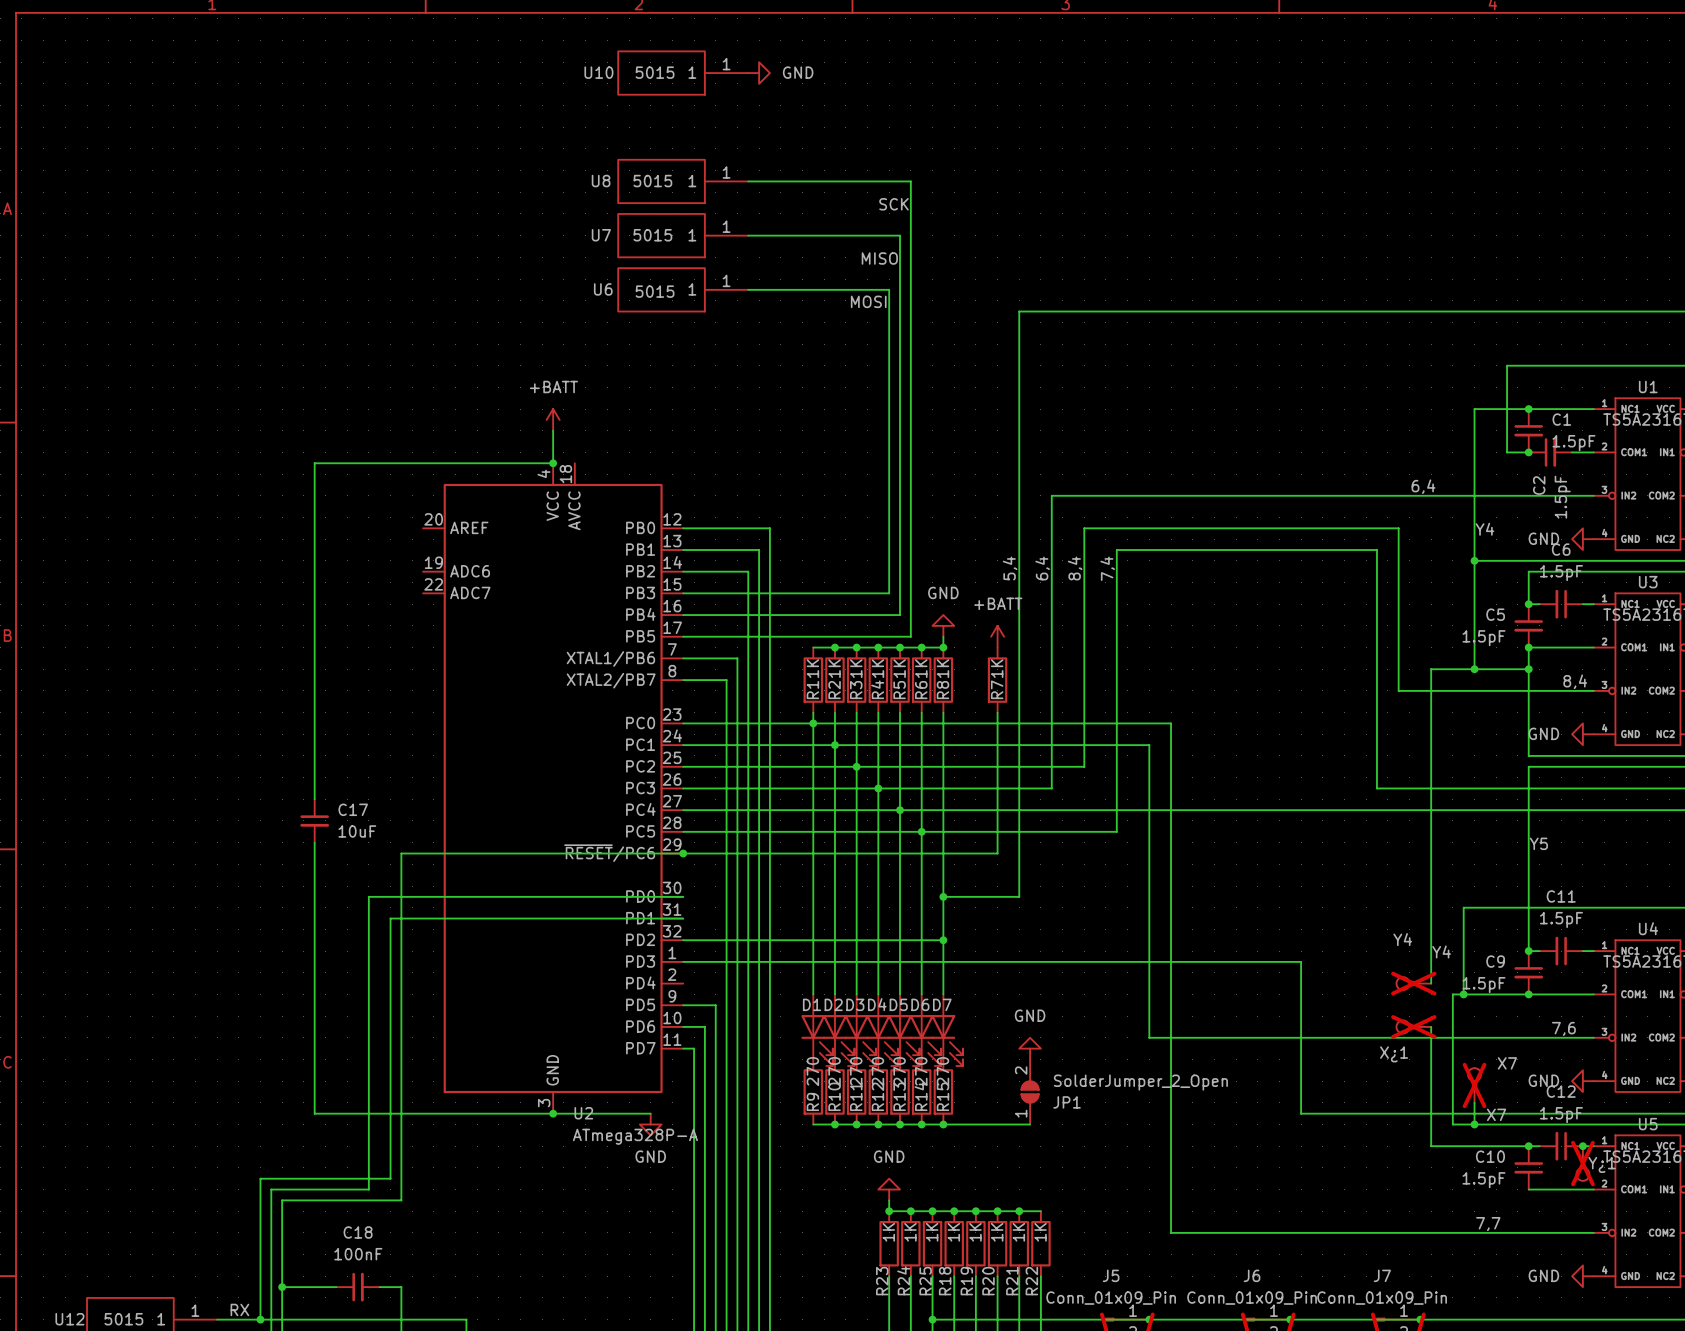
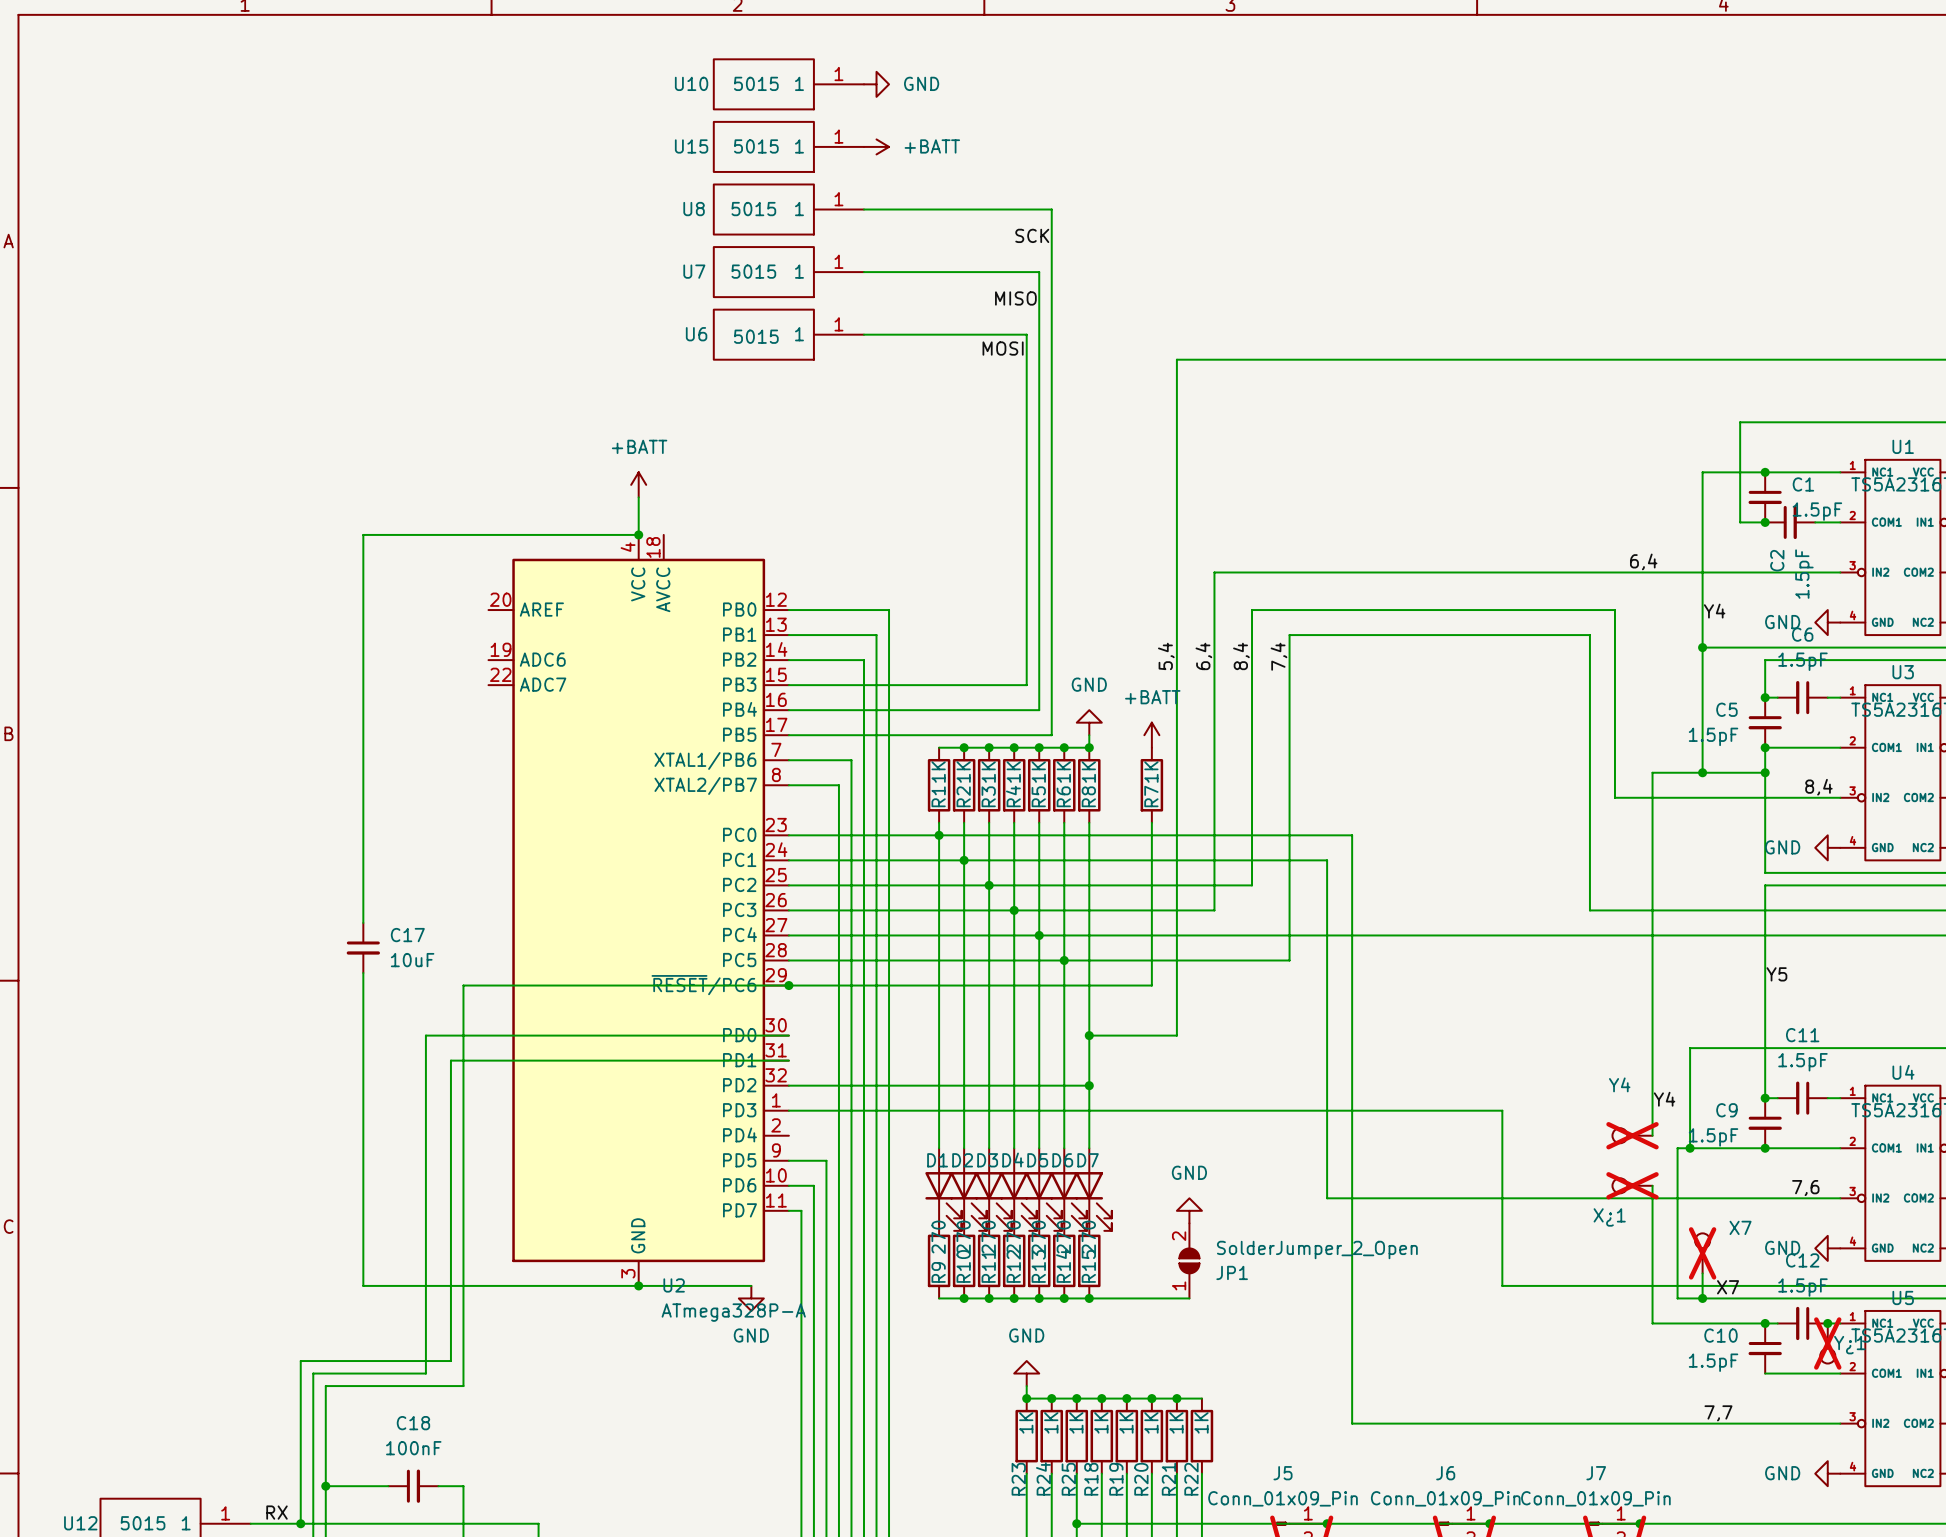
U15: none -> 5015 (788, 146)
power symbol: none -> +BATT (876, 146)

